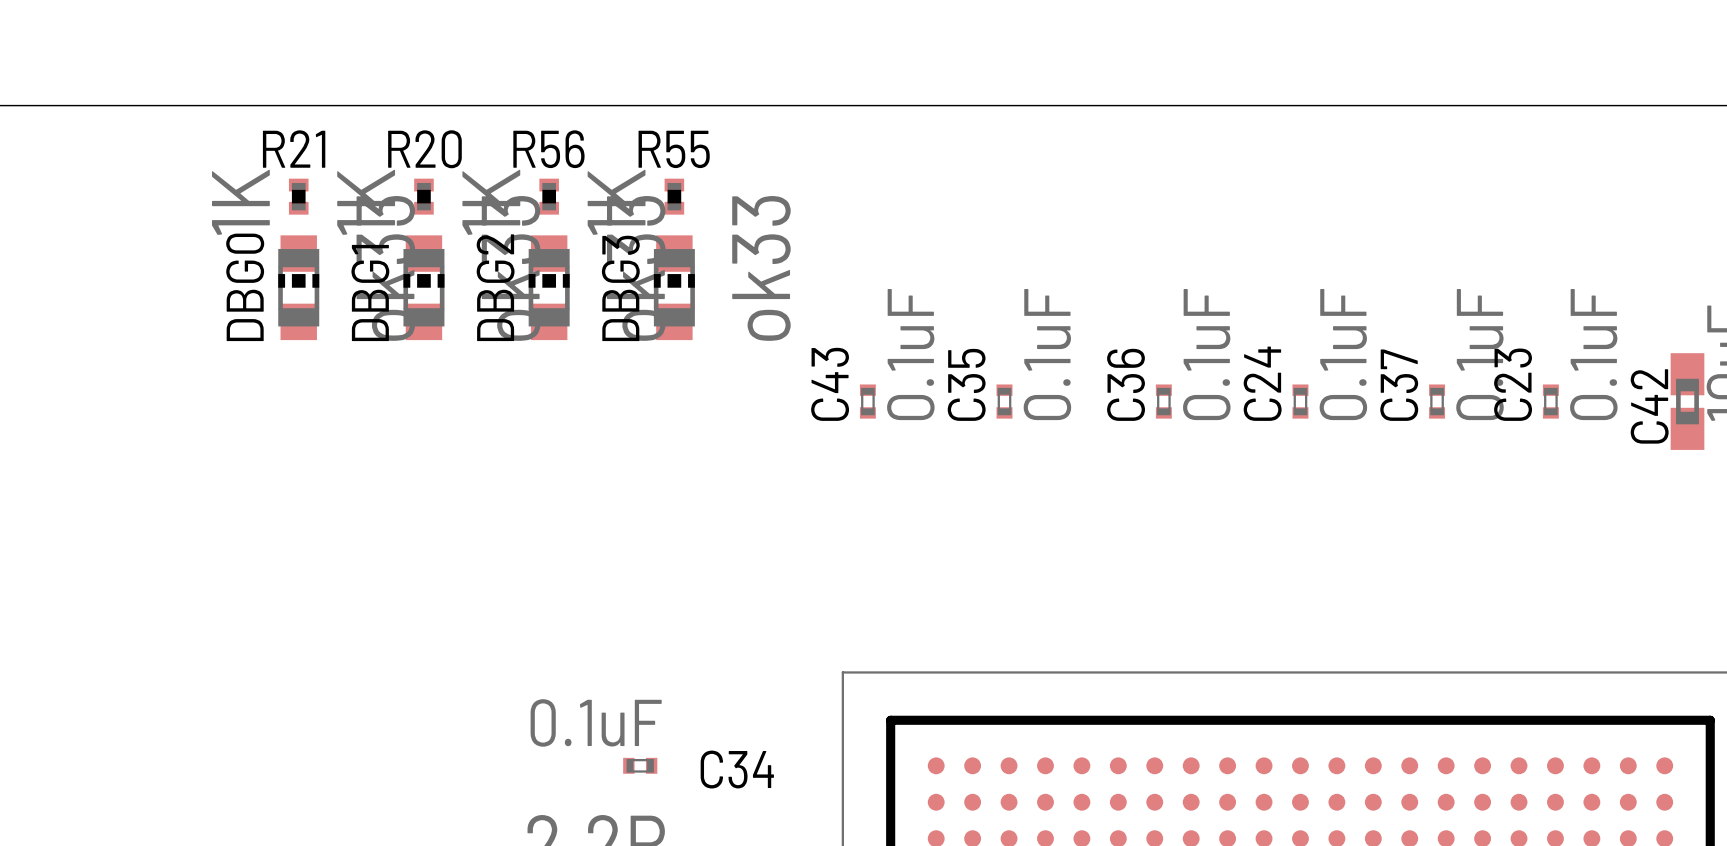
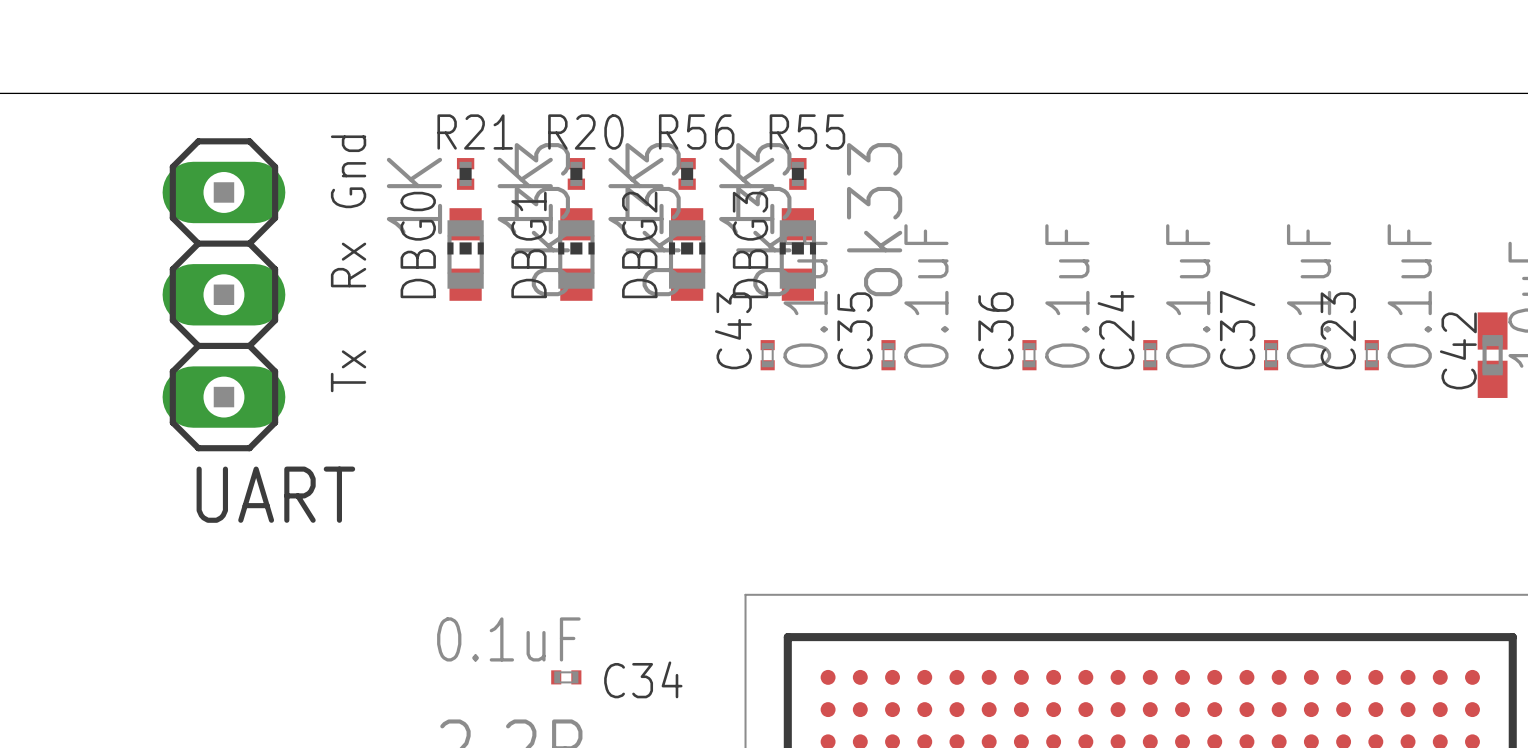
R21 position: (298, 196) -> (465, 173)
R20 position: (423, 196) -> (576, 173)
R56 position: (549, 196) -> (687, 173)
R55 position: (674, 196) -> (797, 173)
text: none -> Gnd (348, 171)
DBG0 position: (298, 287) -> (465, 254)
DBG1 position: (423, 287) -> (576, 254)
DBG2 position: (549, 287) -> (687, 254)
DBG3 position: (674, 287) -> (797, 254)
text: none -> Rx (348, 264)
UART: none -> (223, 294)
text: none -> Tx (348, 371)

